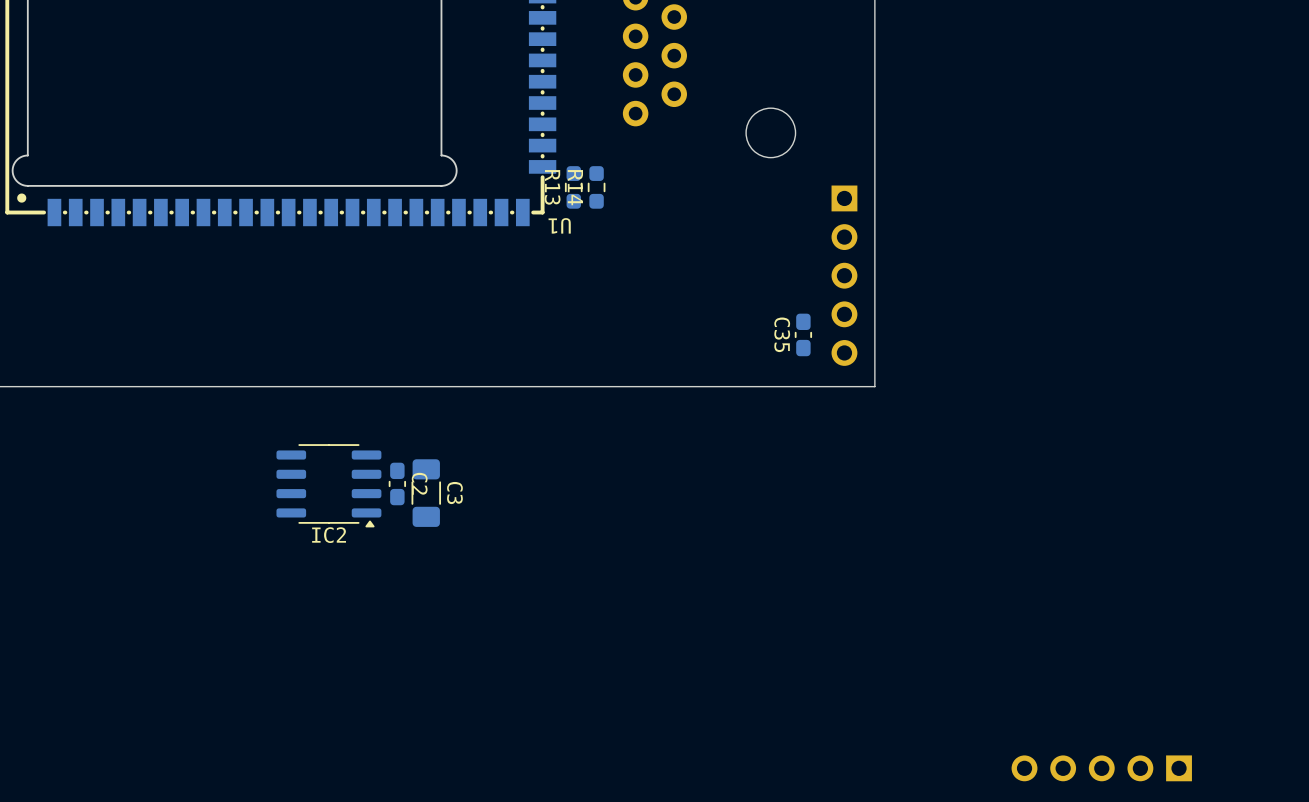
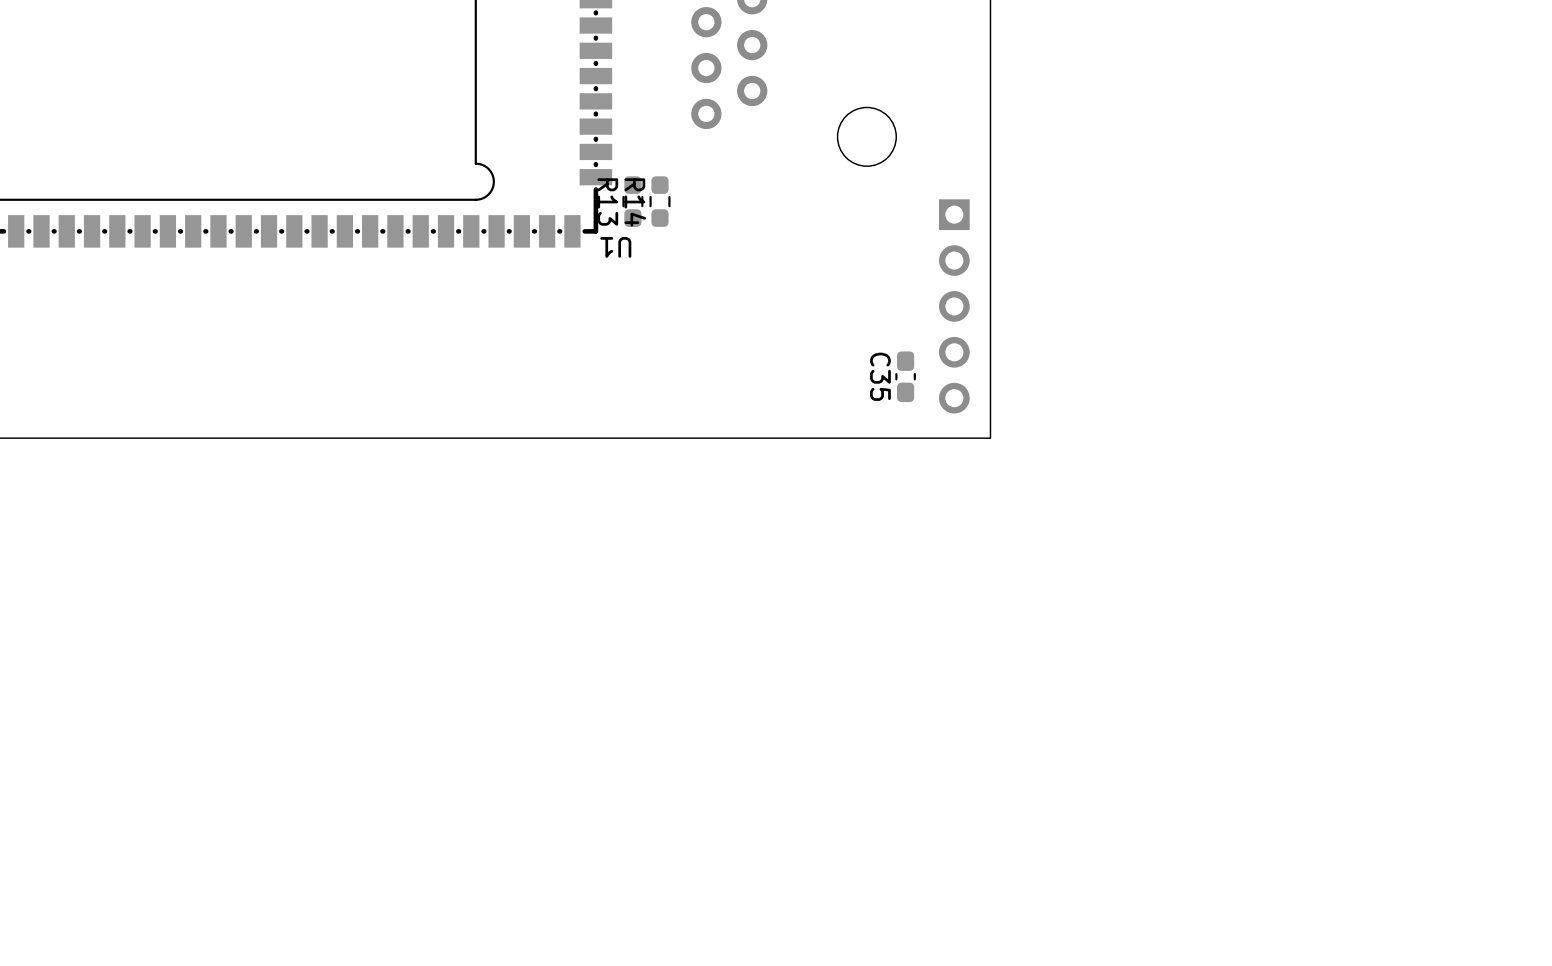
C2: (397, 483) -> none
IC2: (328, 485) -> none
C3: (426, 493) -> none
part: (1101, 768) -> none

